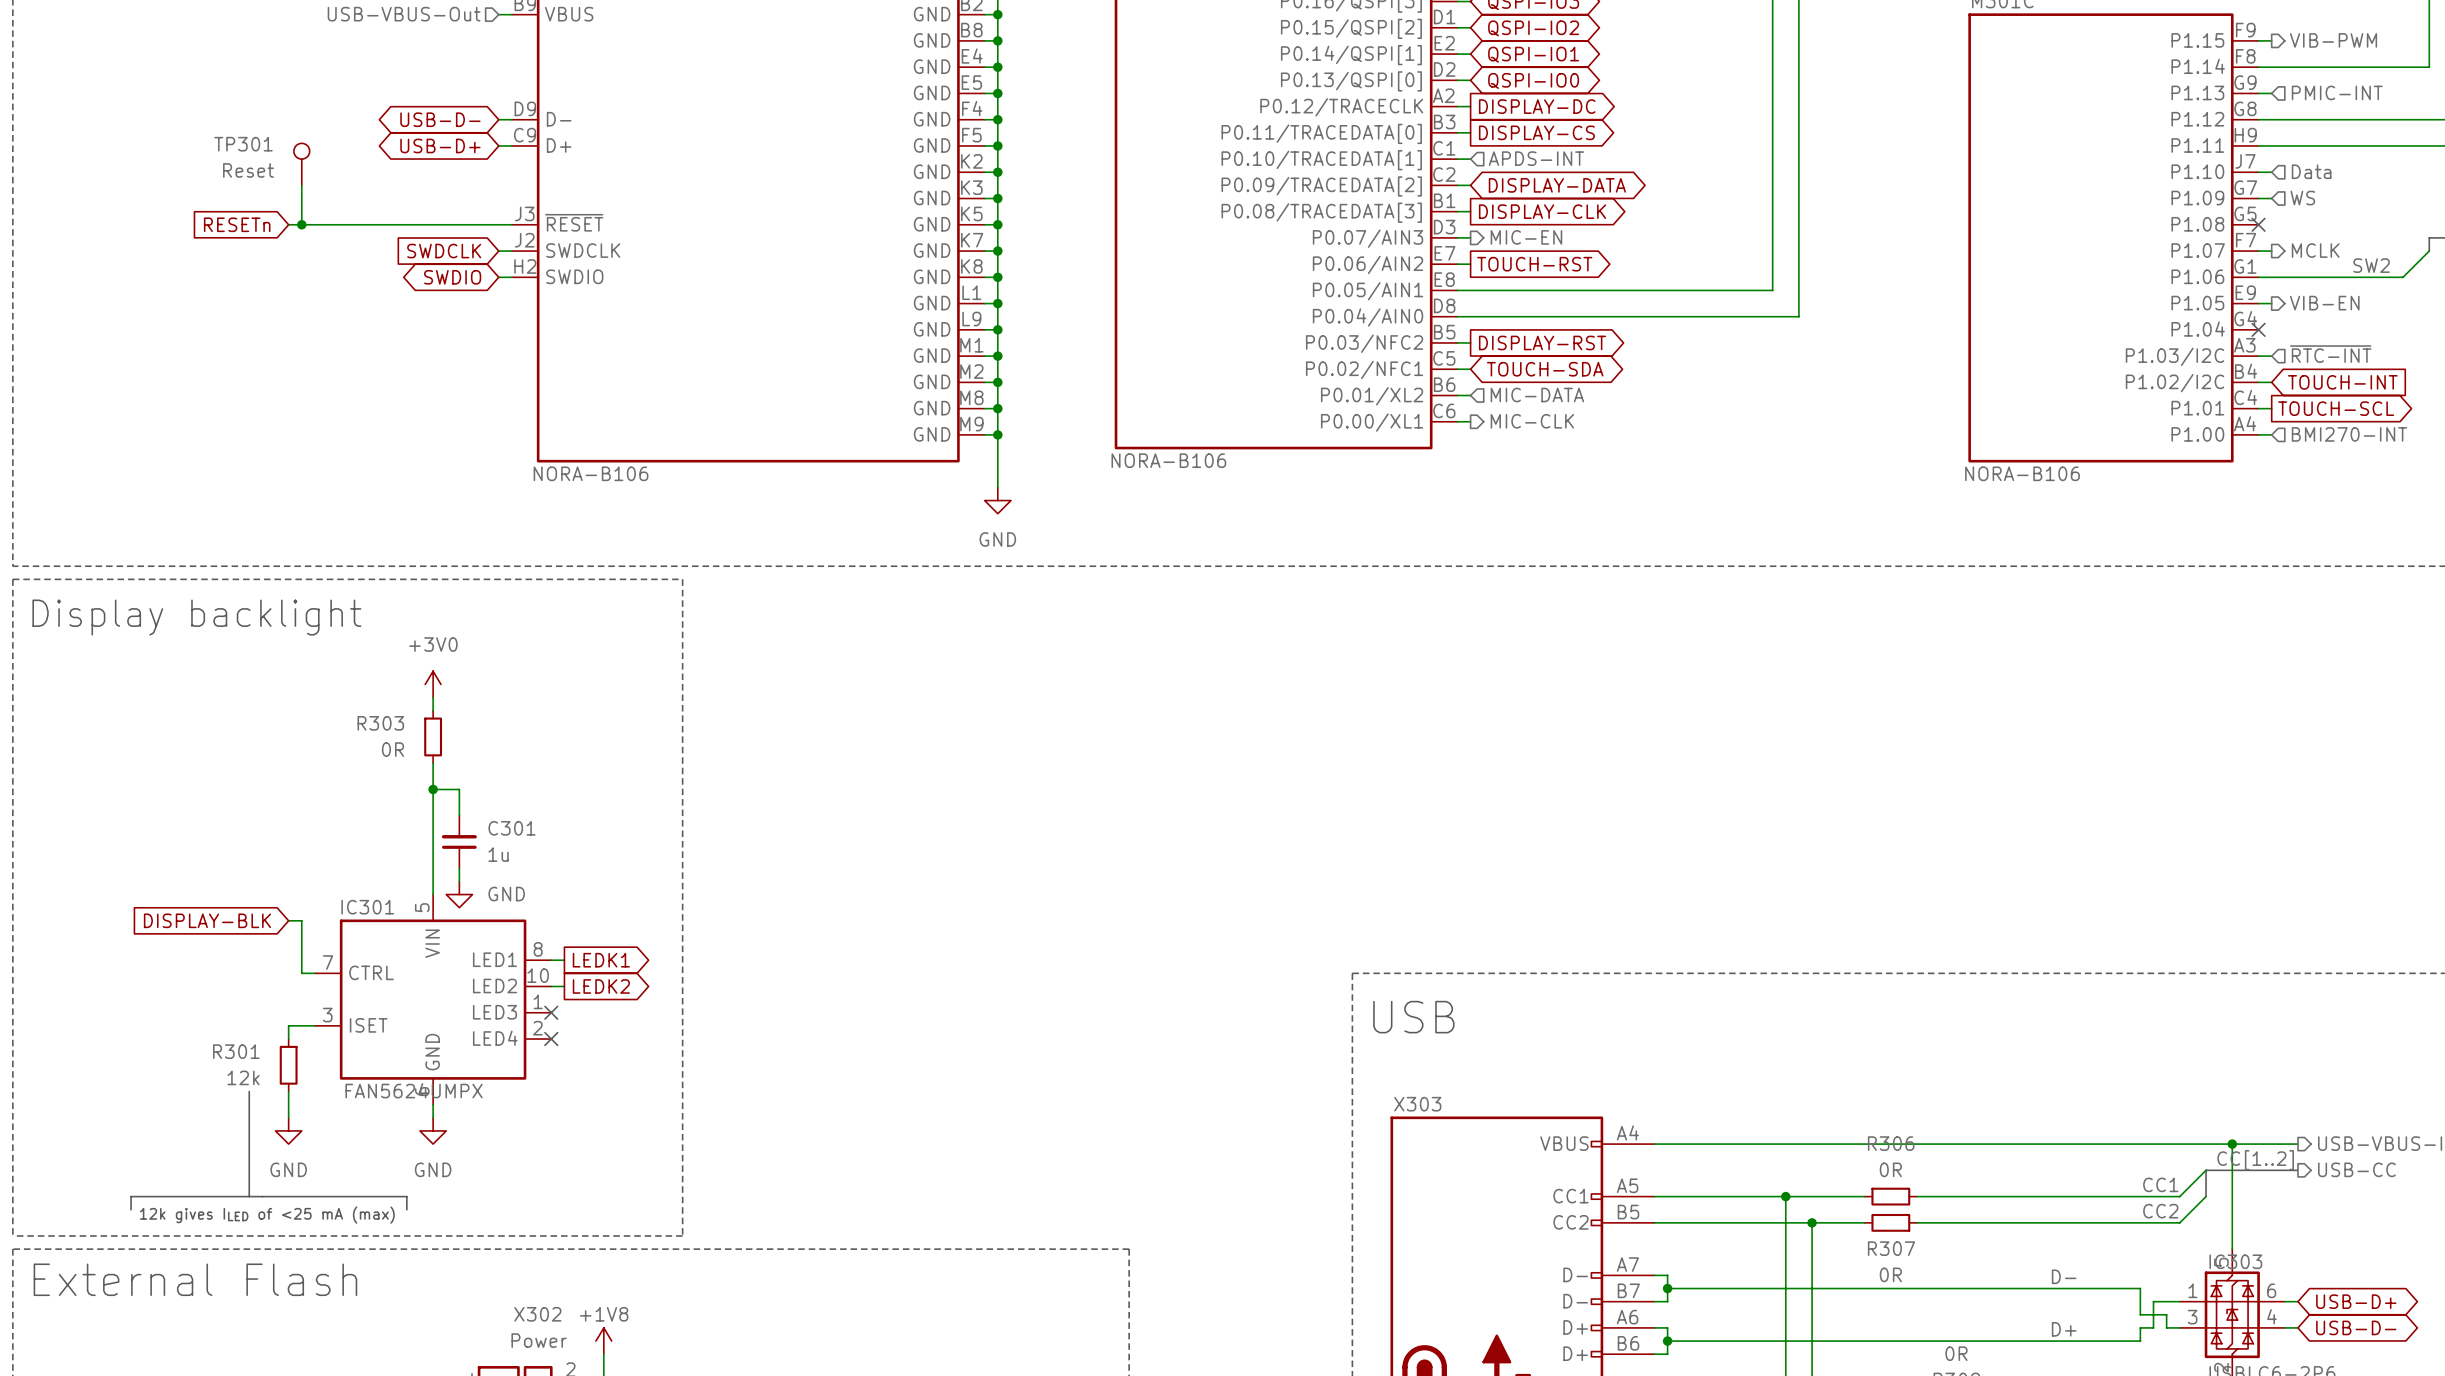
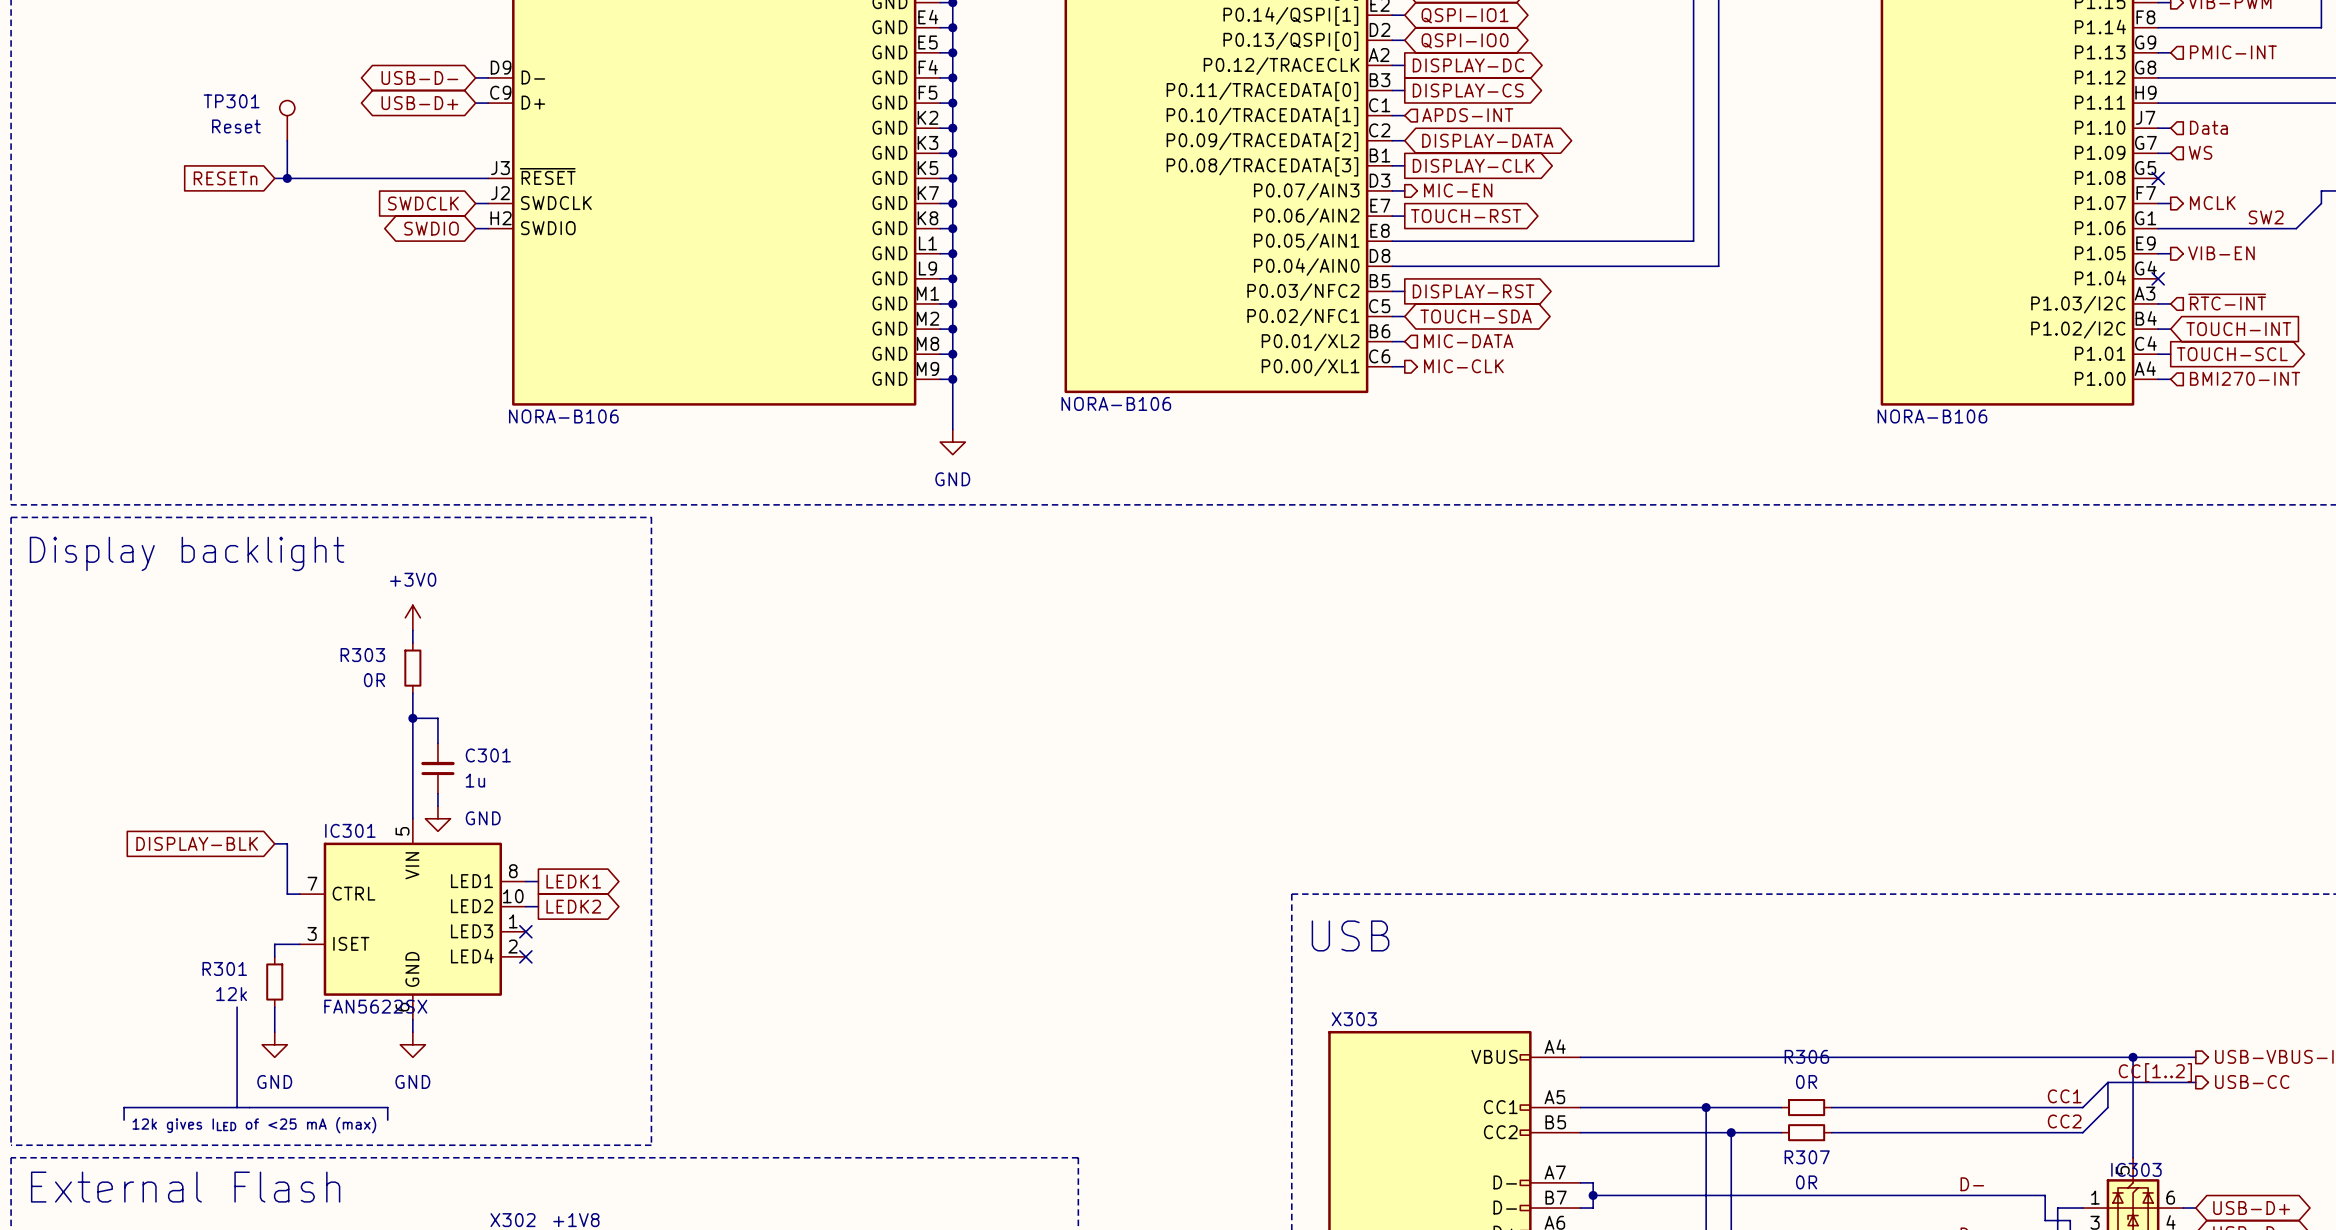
IC301 value: FAN5624UMPX (414, 1090) -> FAN5622SX (375, 1006)

